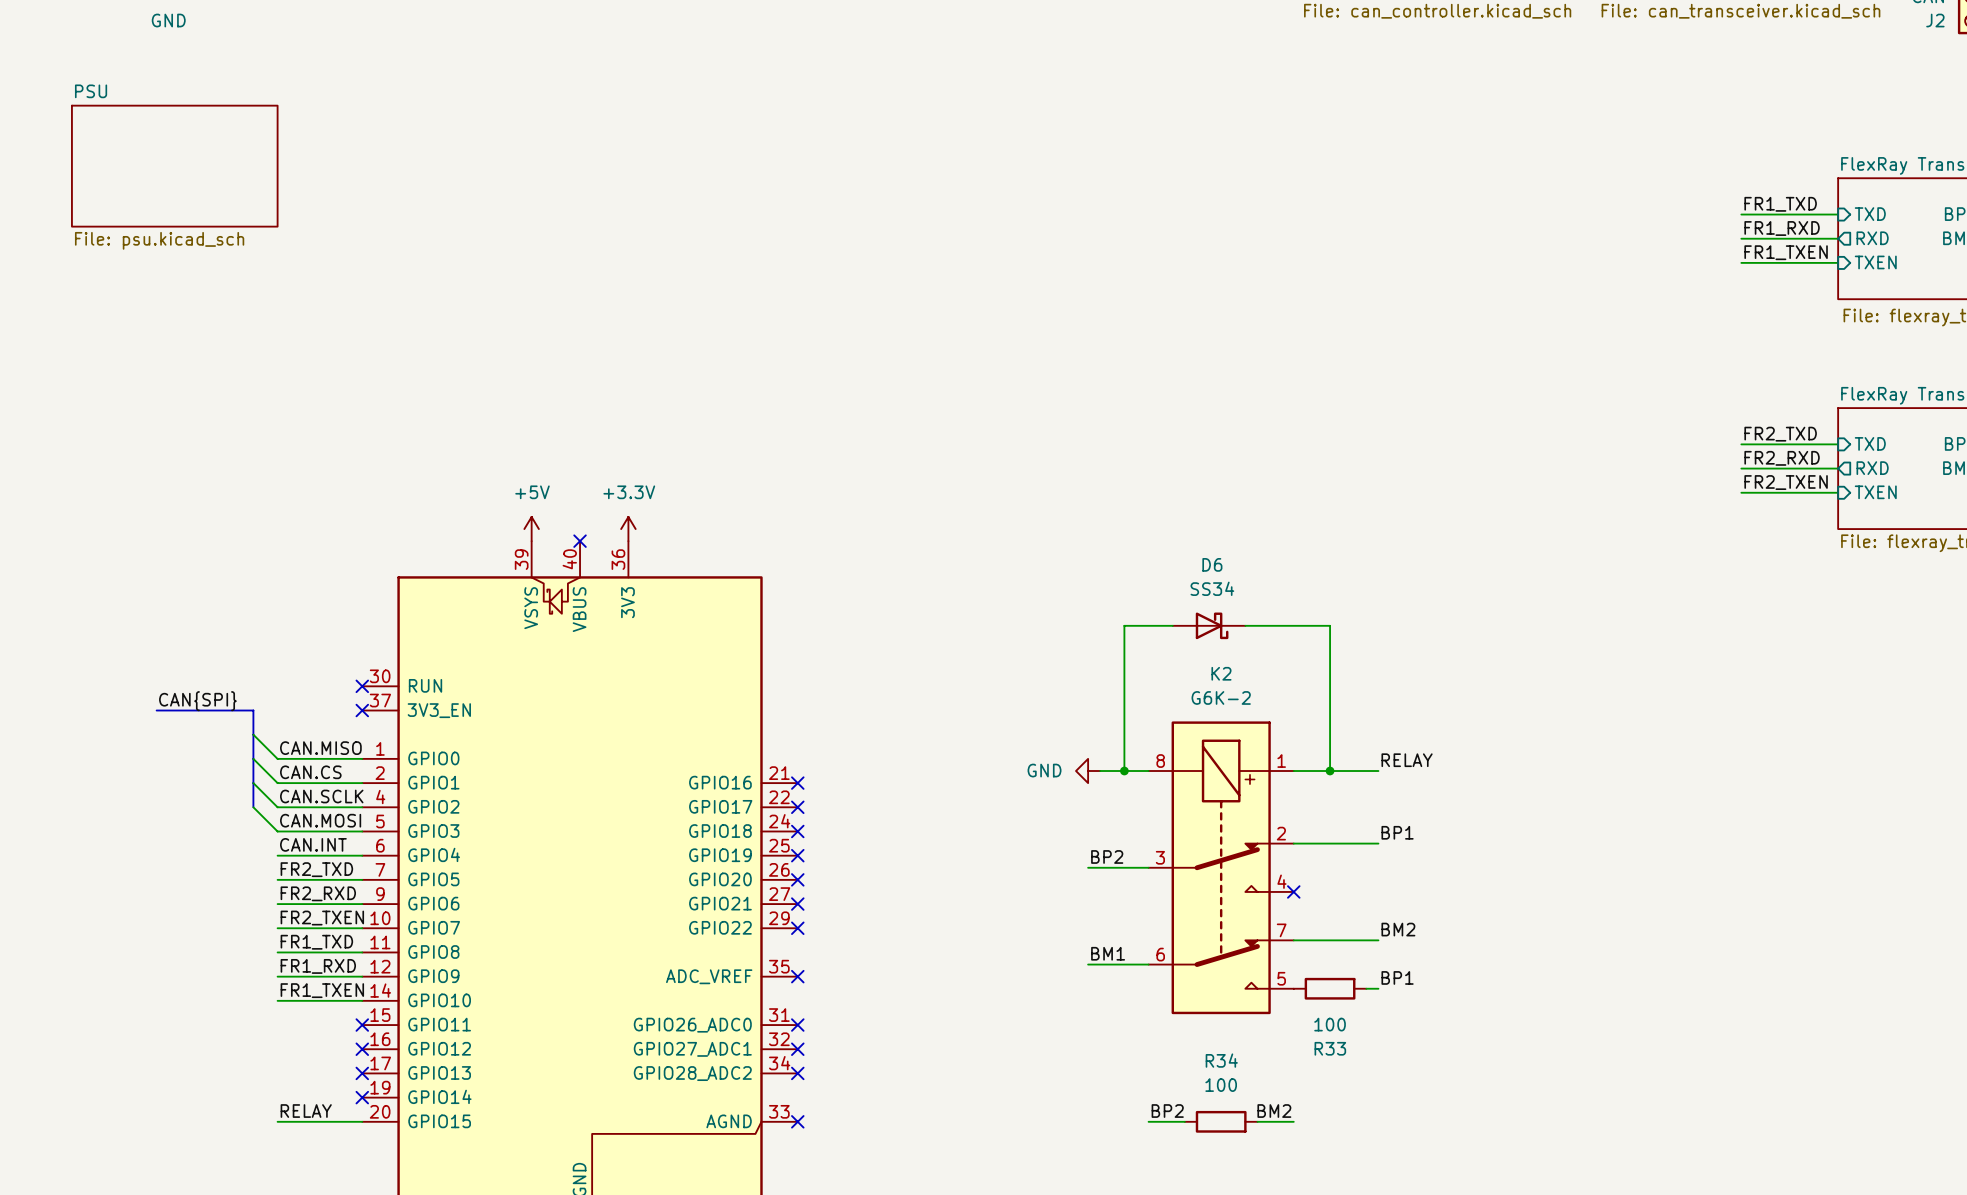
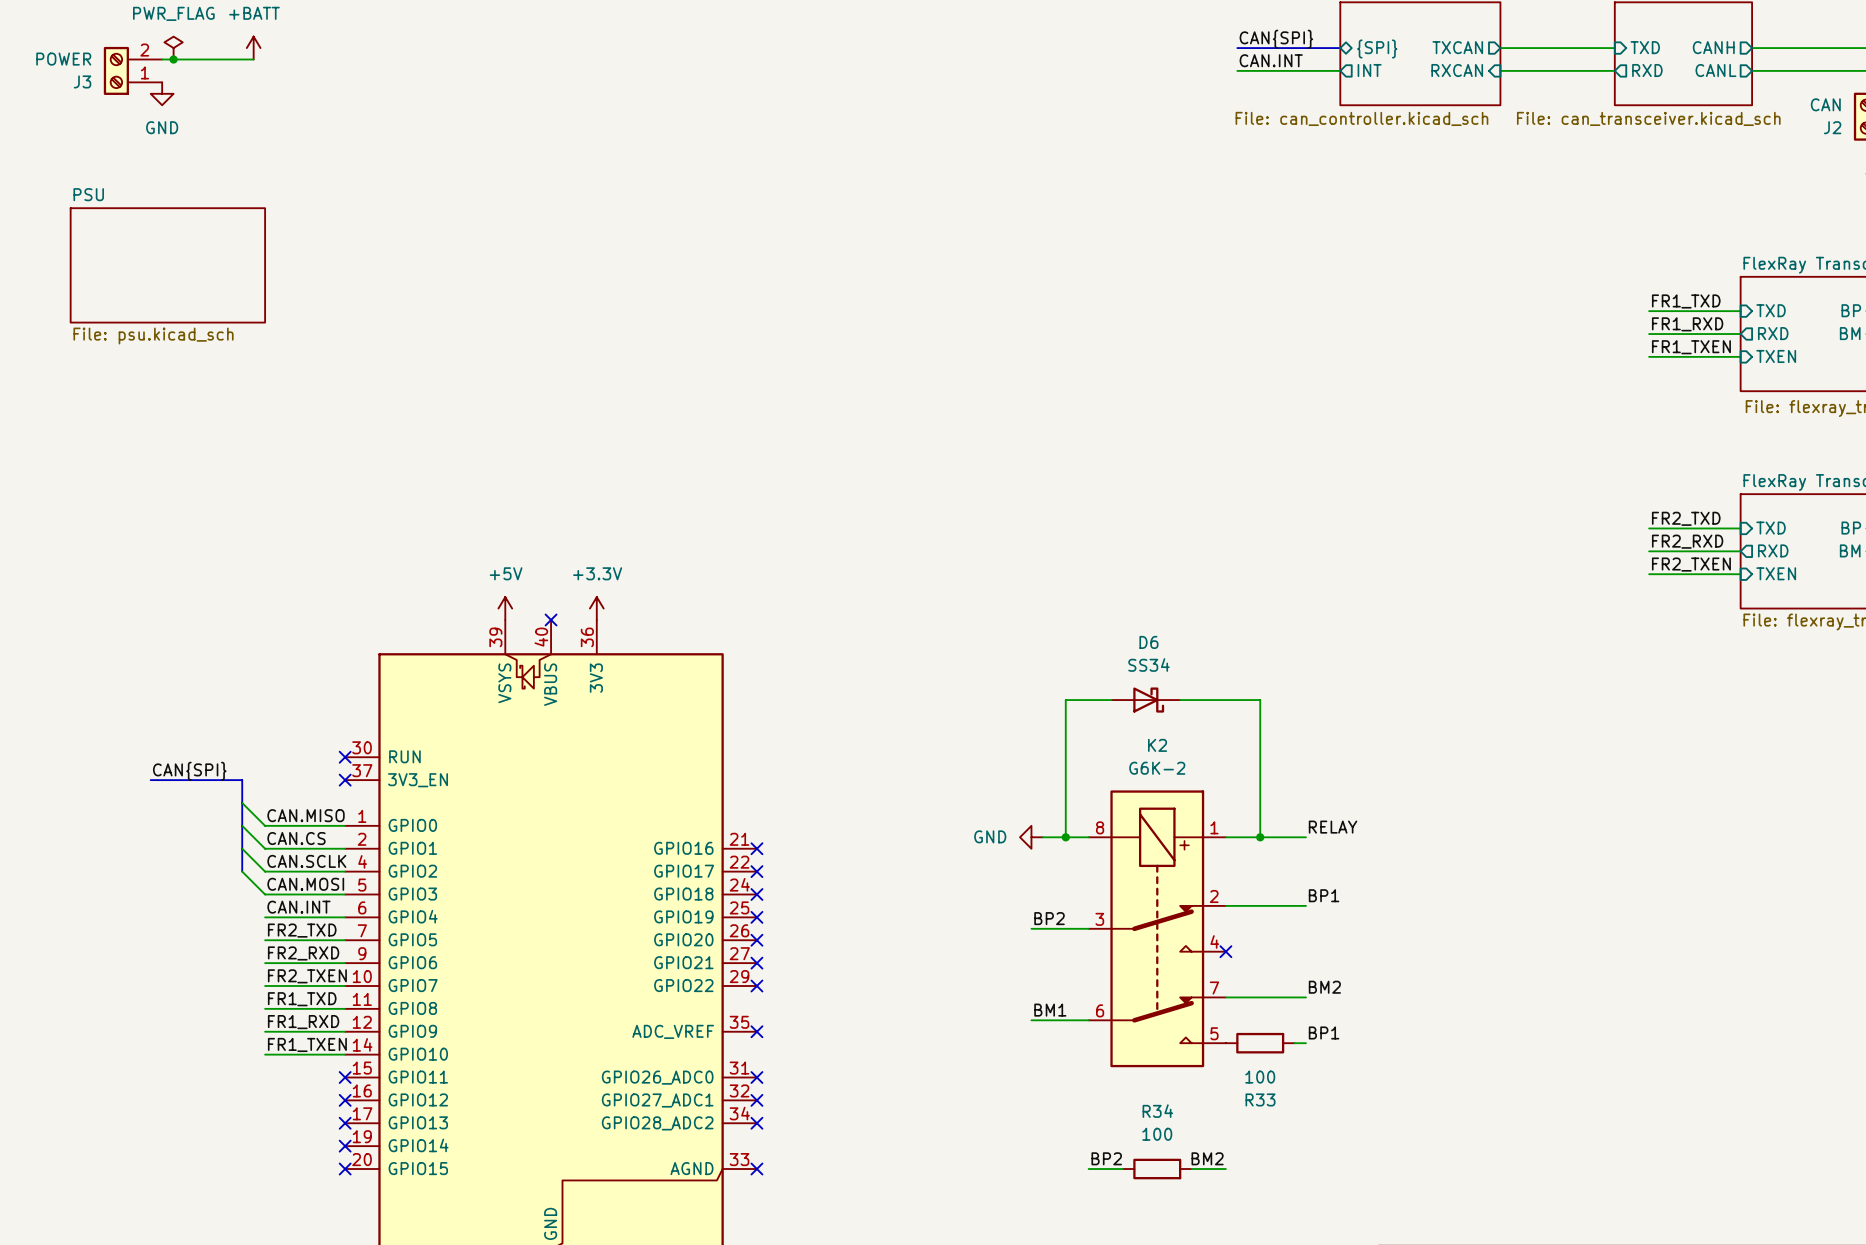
label: RELAY (306, 1111) -> none
wire: (277, 1121) (362, 1121) -> none
no-connect mark: none -> (345, 1169)

